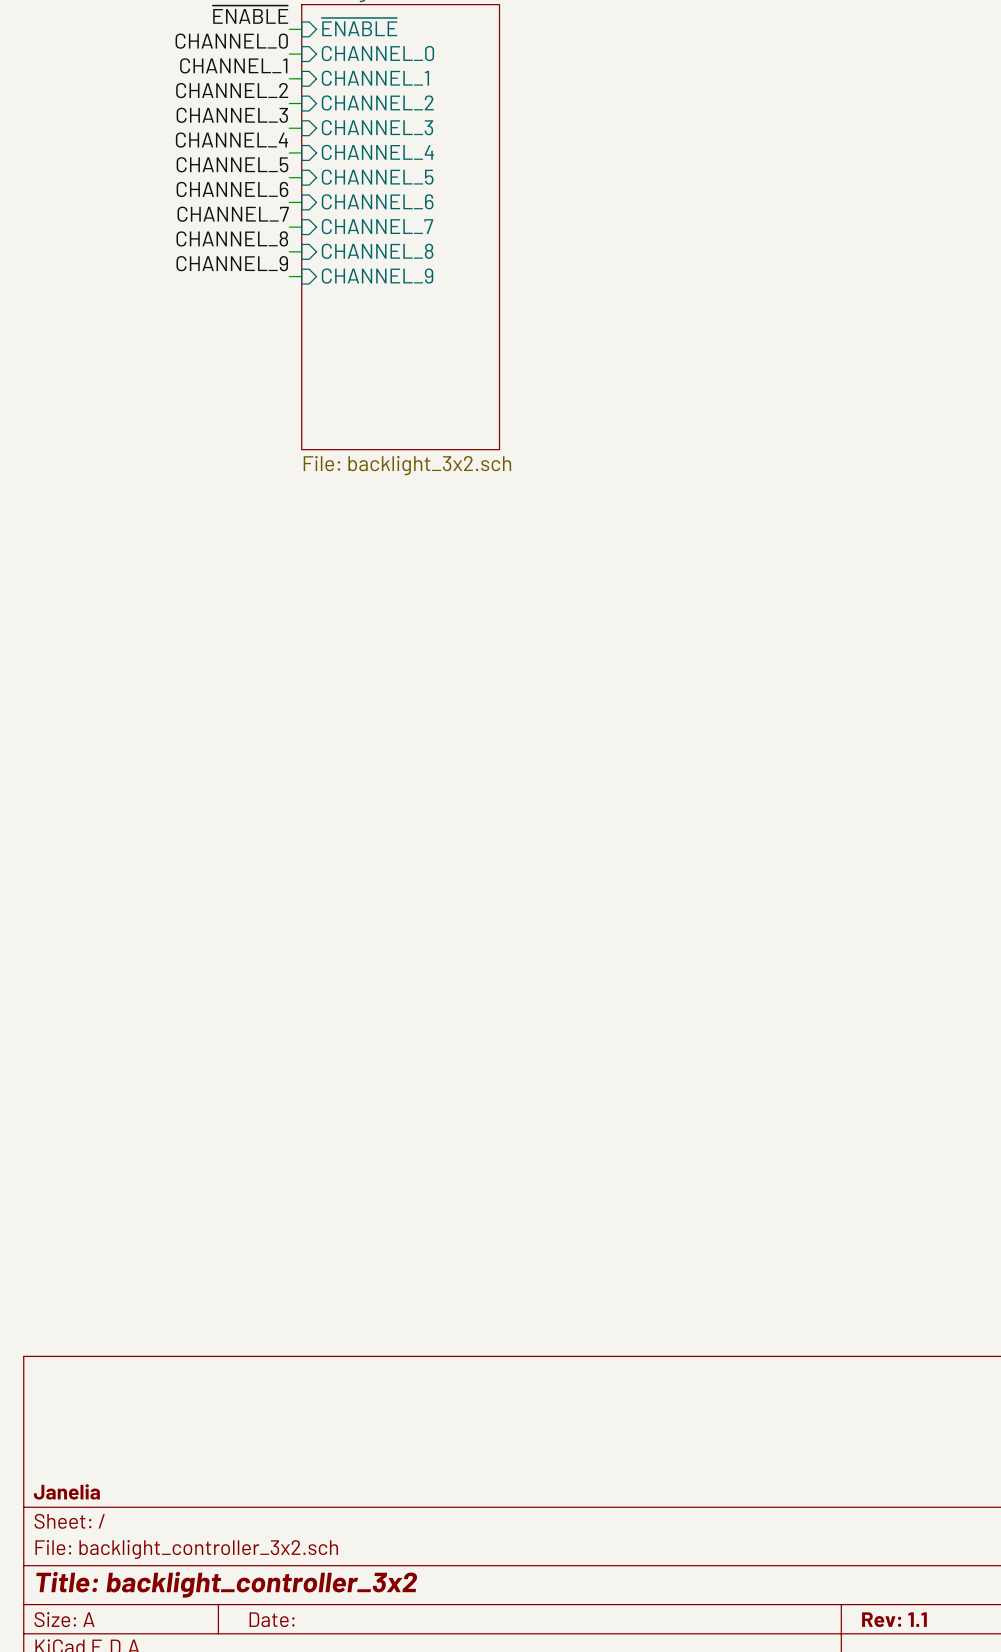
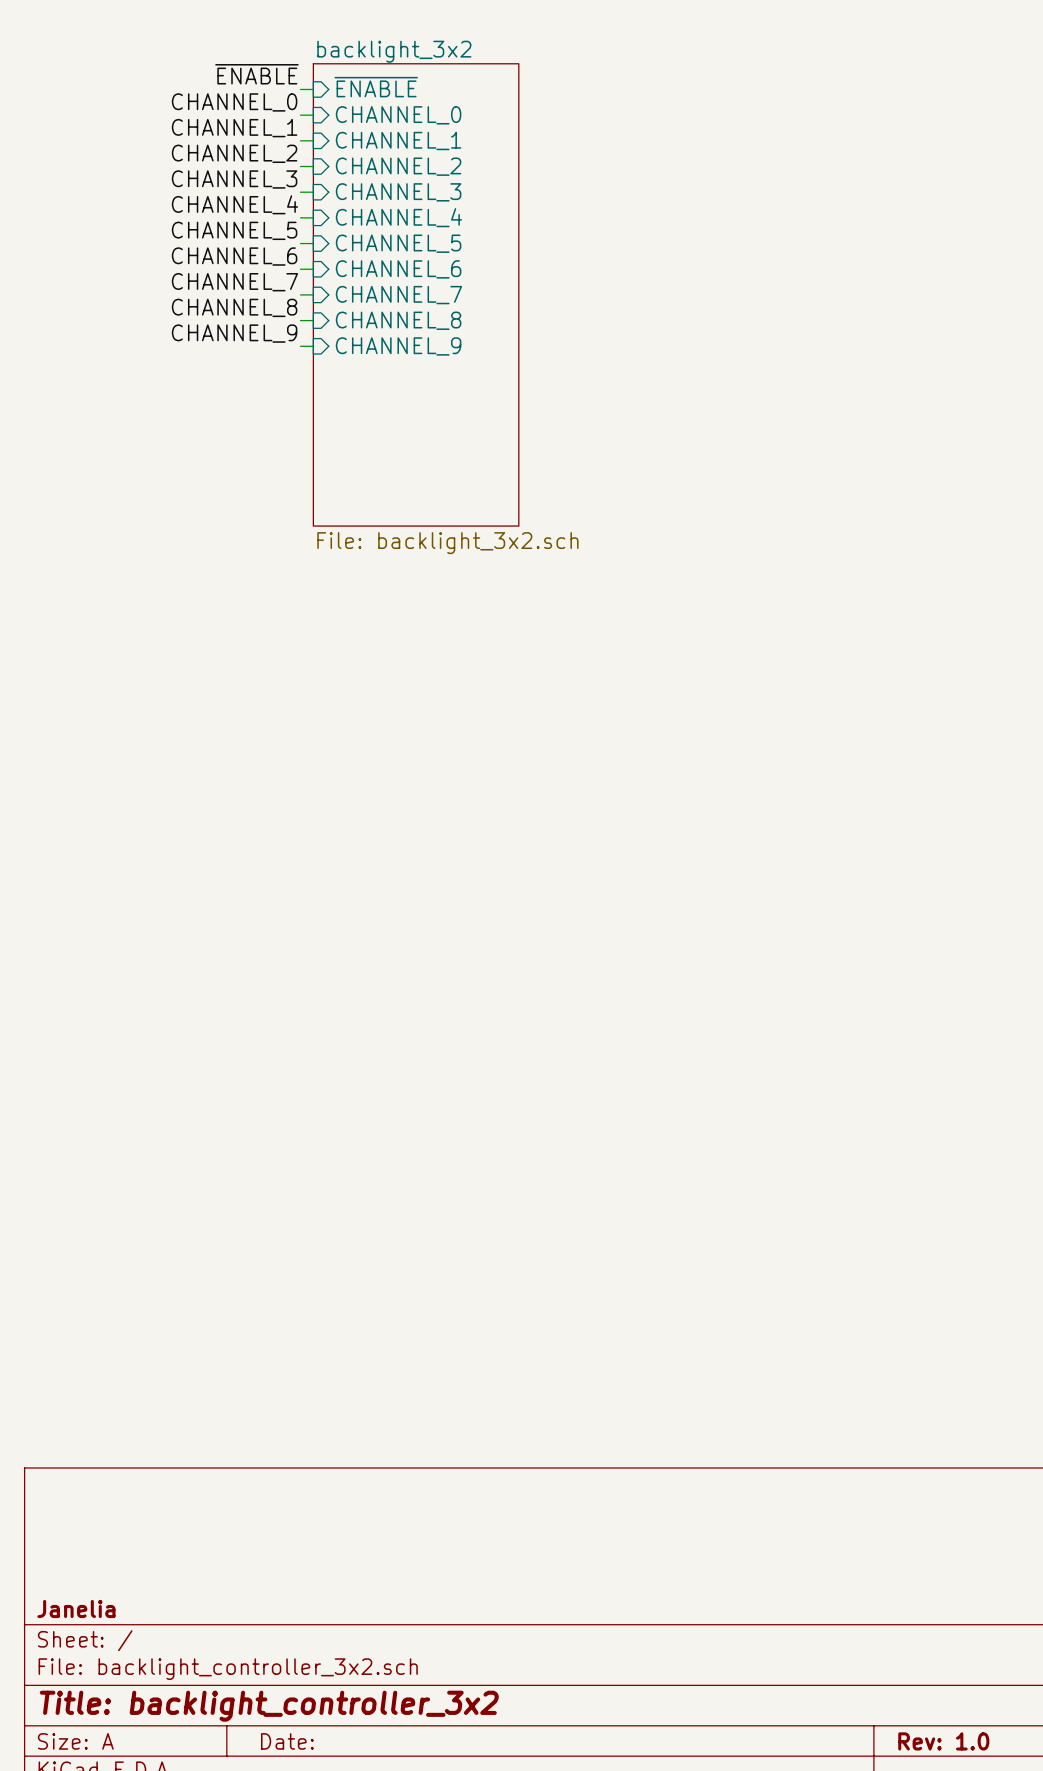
title block: Rev: 1.1 (894, 1619) -> Rev: 1.0 (943, 1741)

